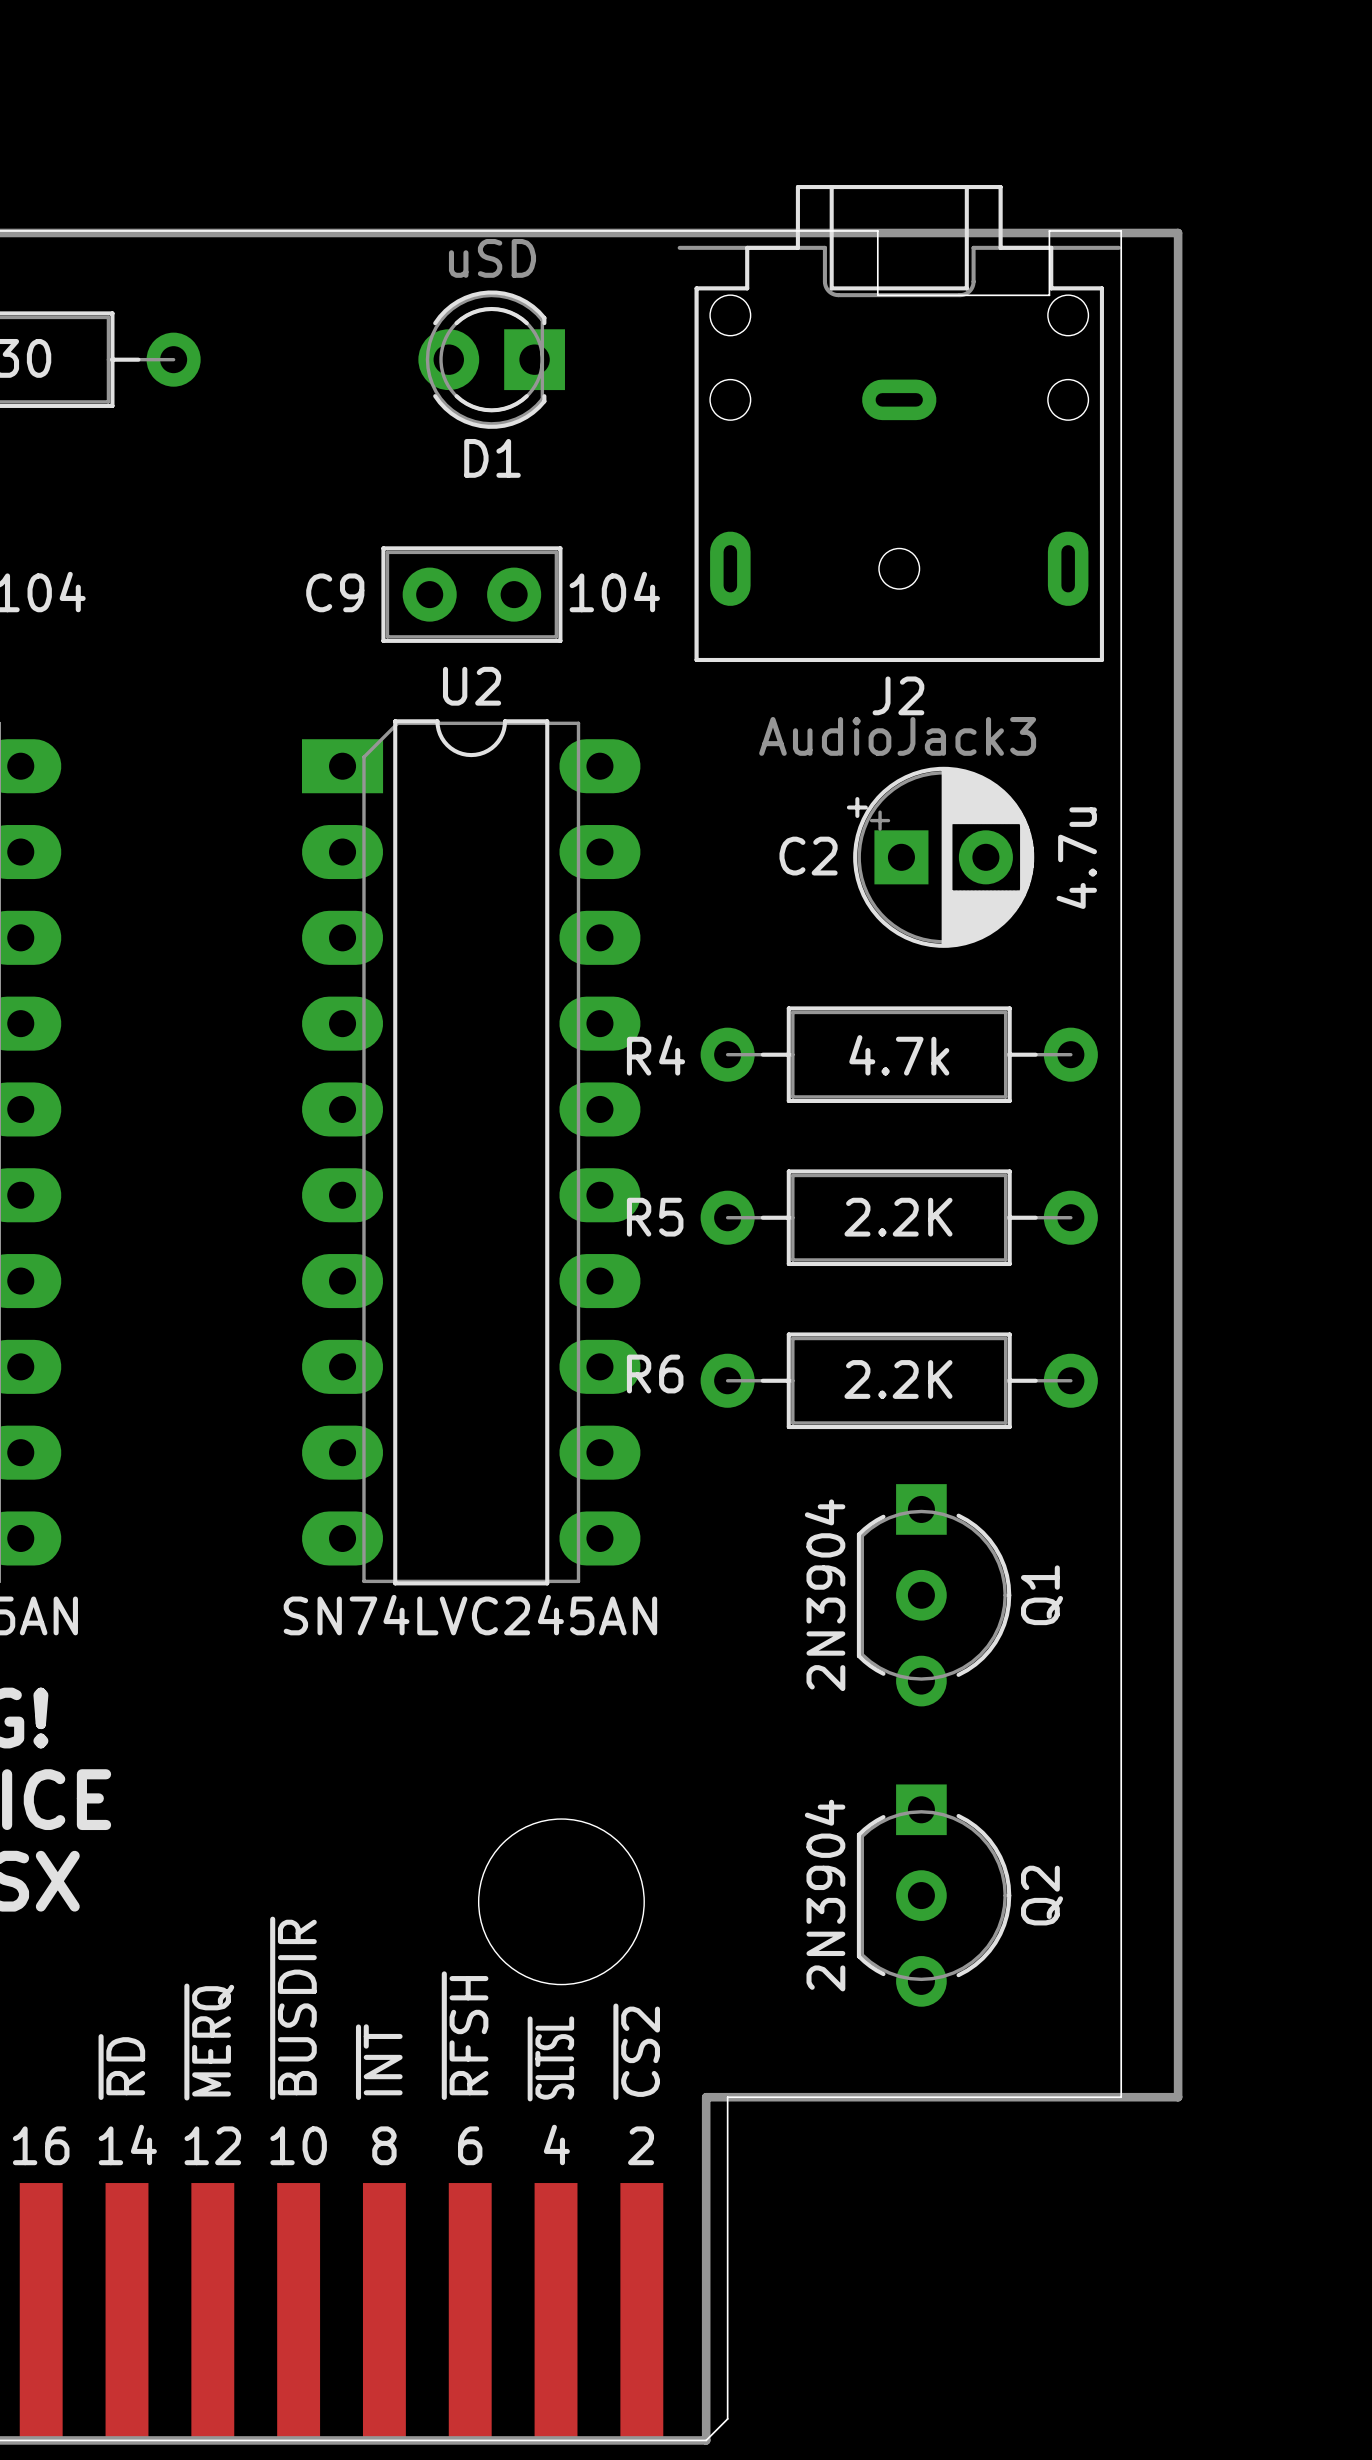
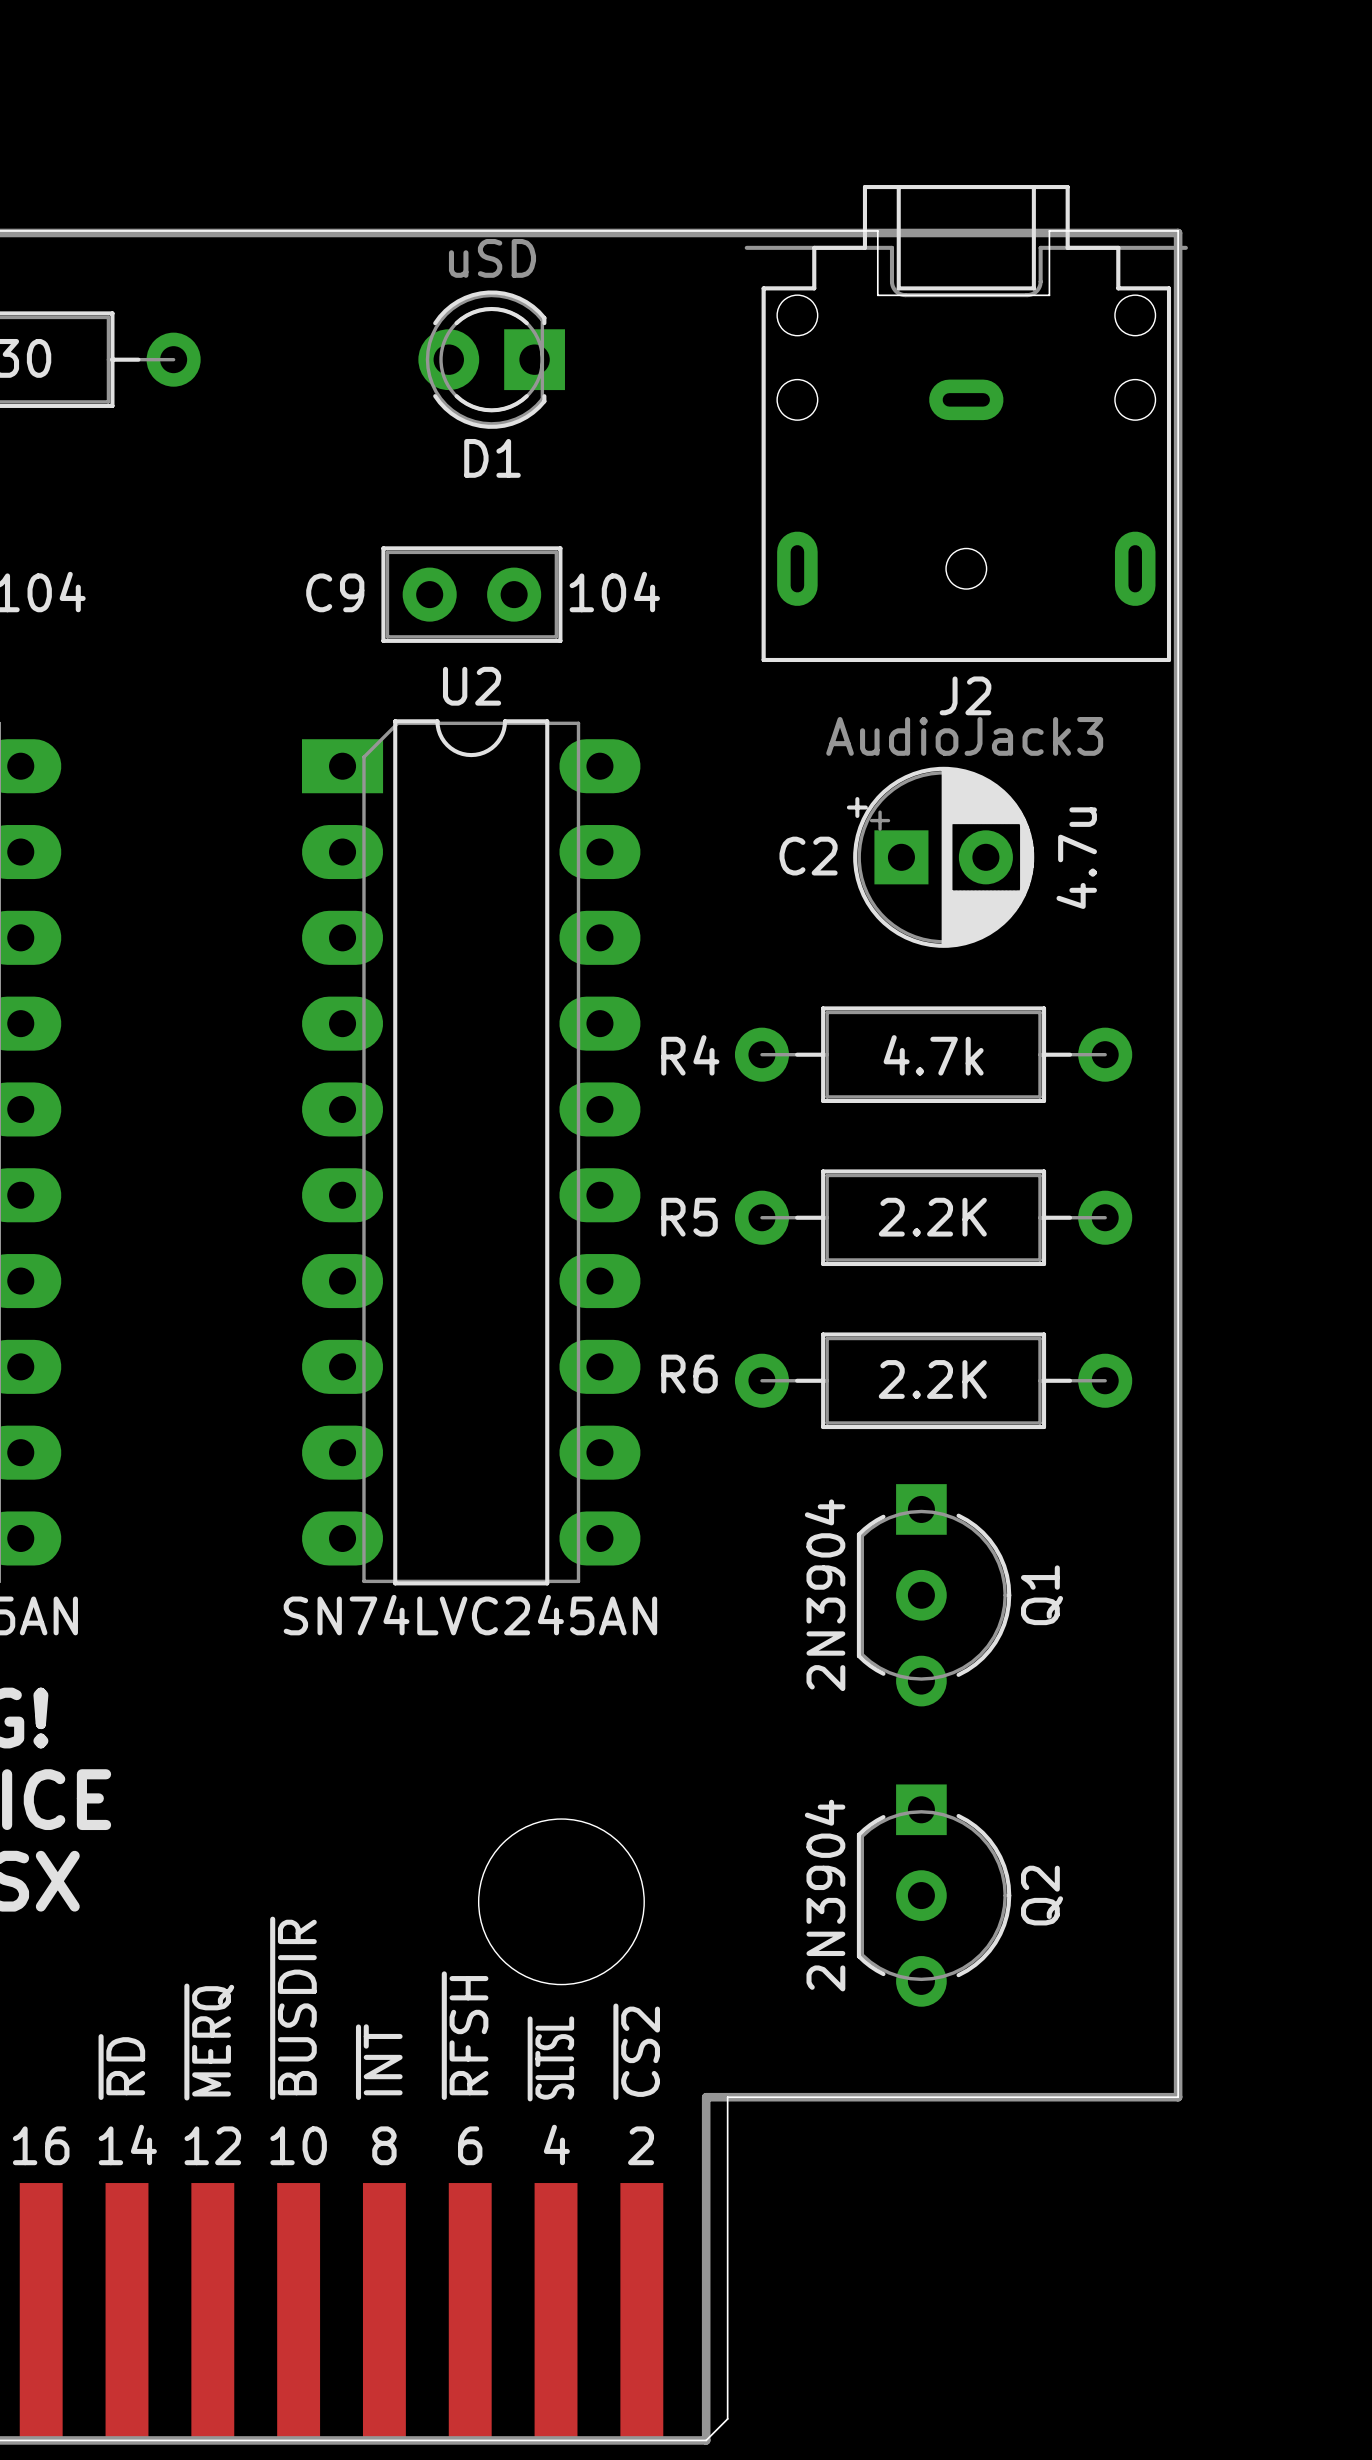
board edge: (1121, 230) (1121, 2097) -> (1121, 230) (1178, 230) (1178, 2097) (1121, 2097)
J2 position: (899, 423) -> (966, 423)
R4 position: (899, 1054) -> (933, 1054)
R5 position: (899, 1217) -> (933, 1217)
R6 position: (899, 1380) -> (933, 1380)

